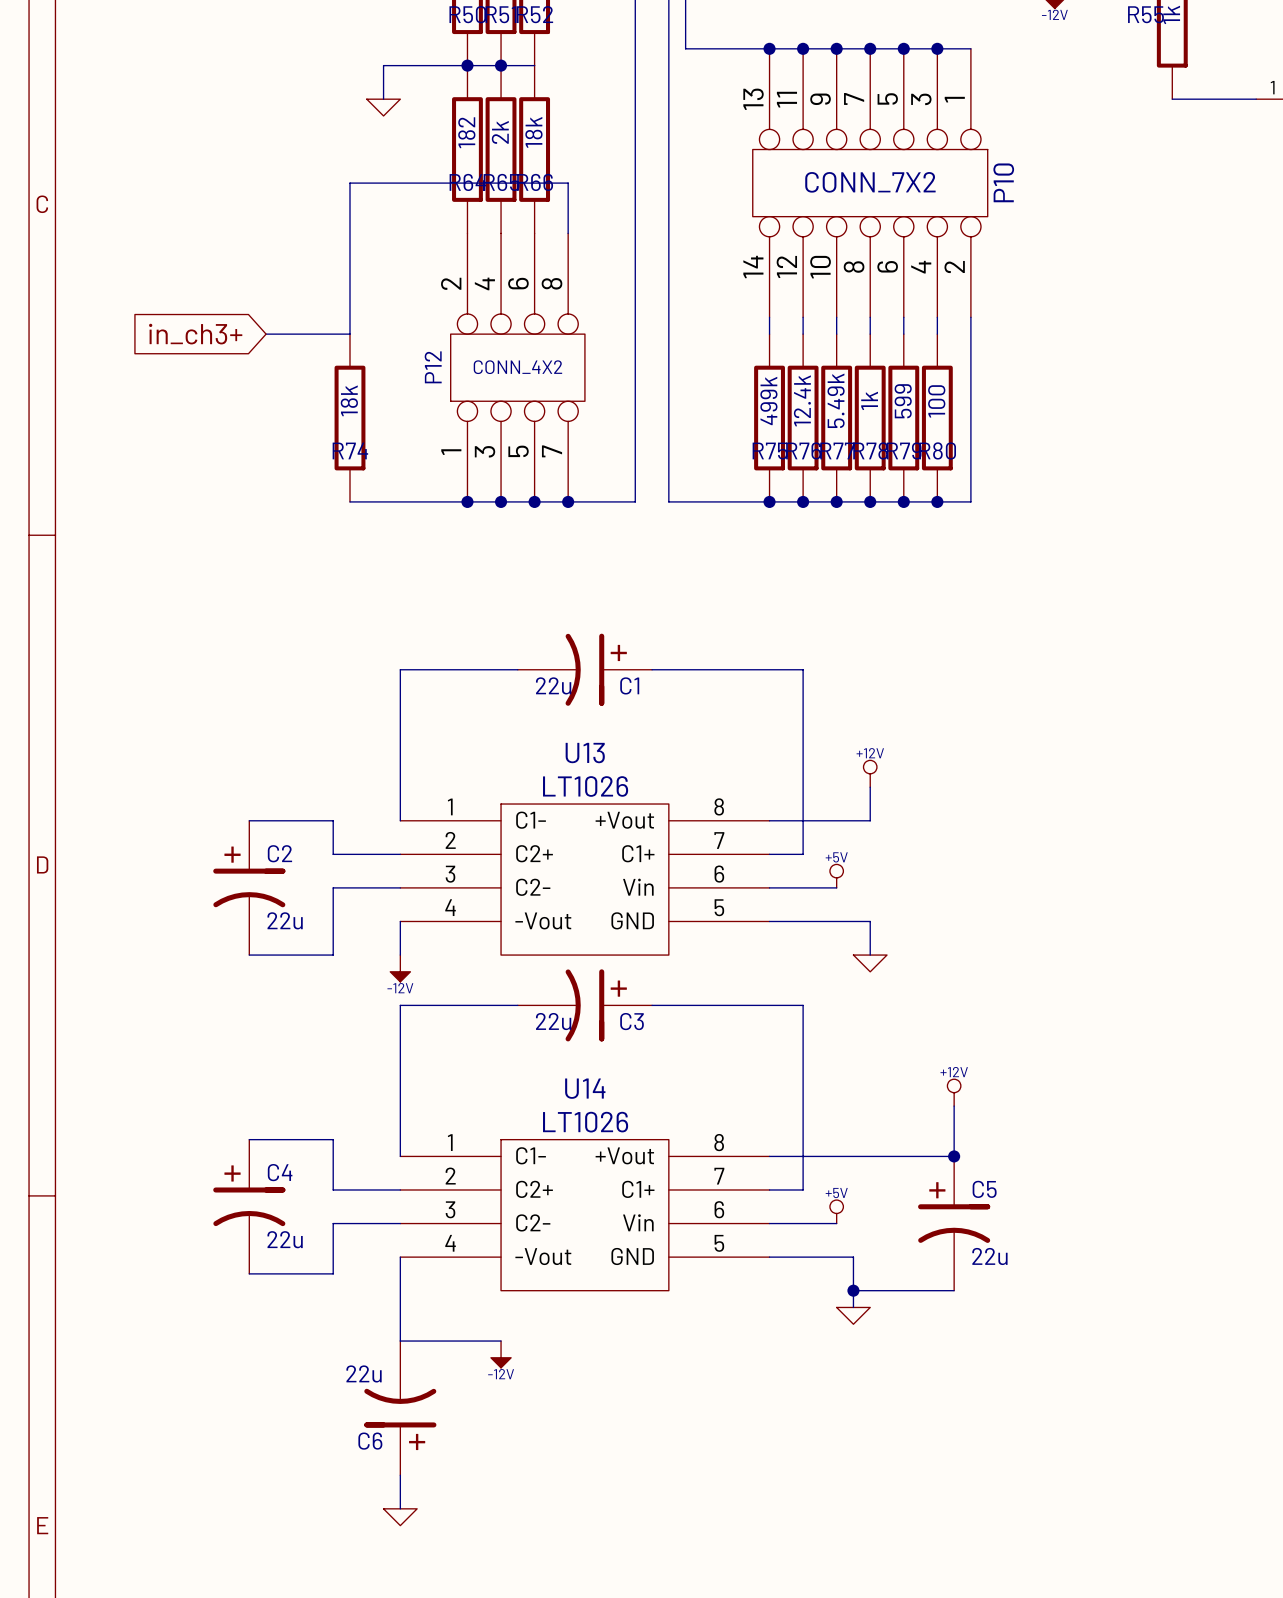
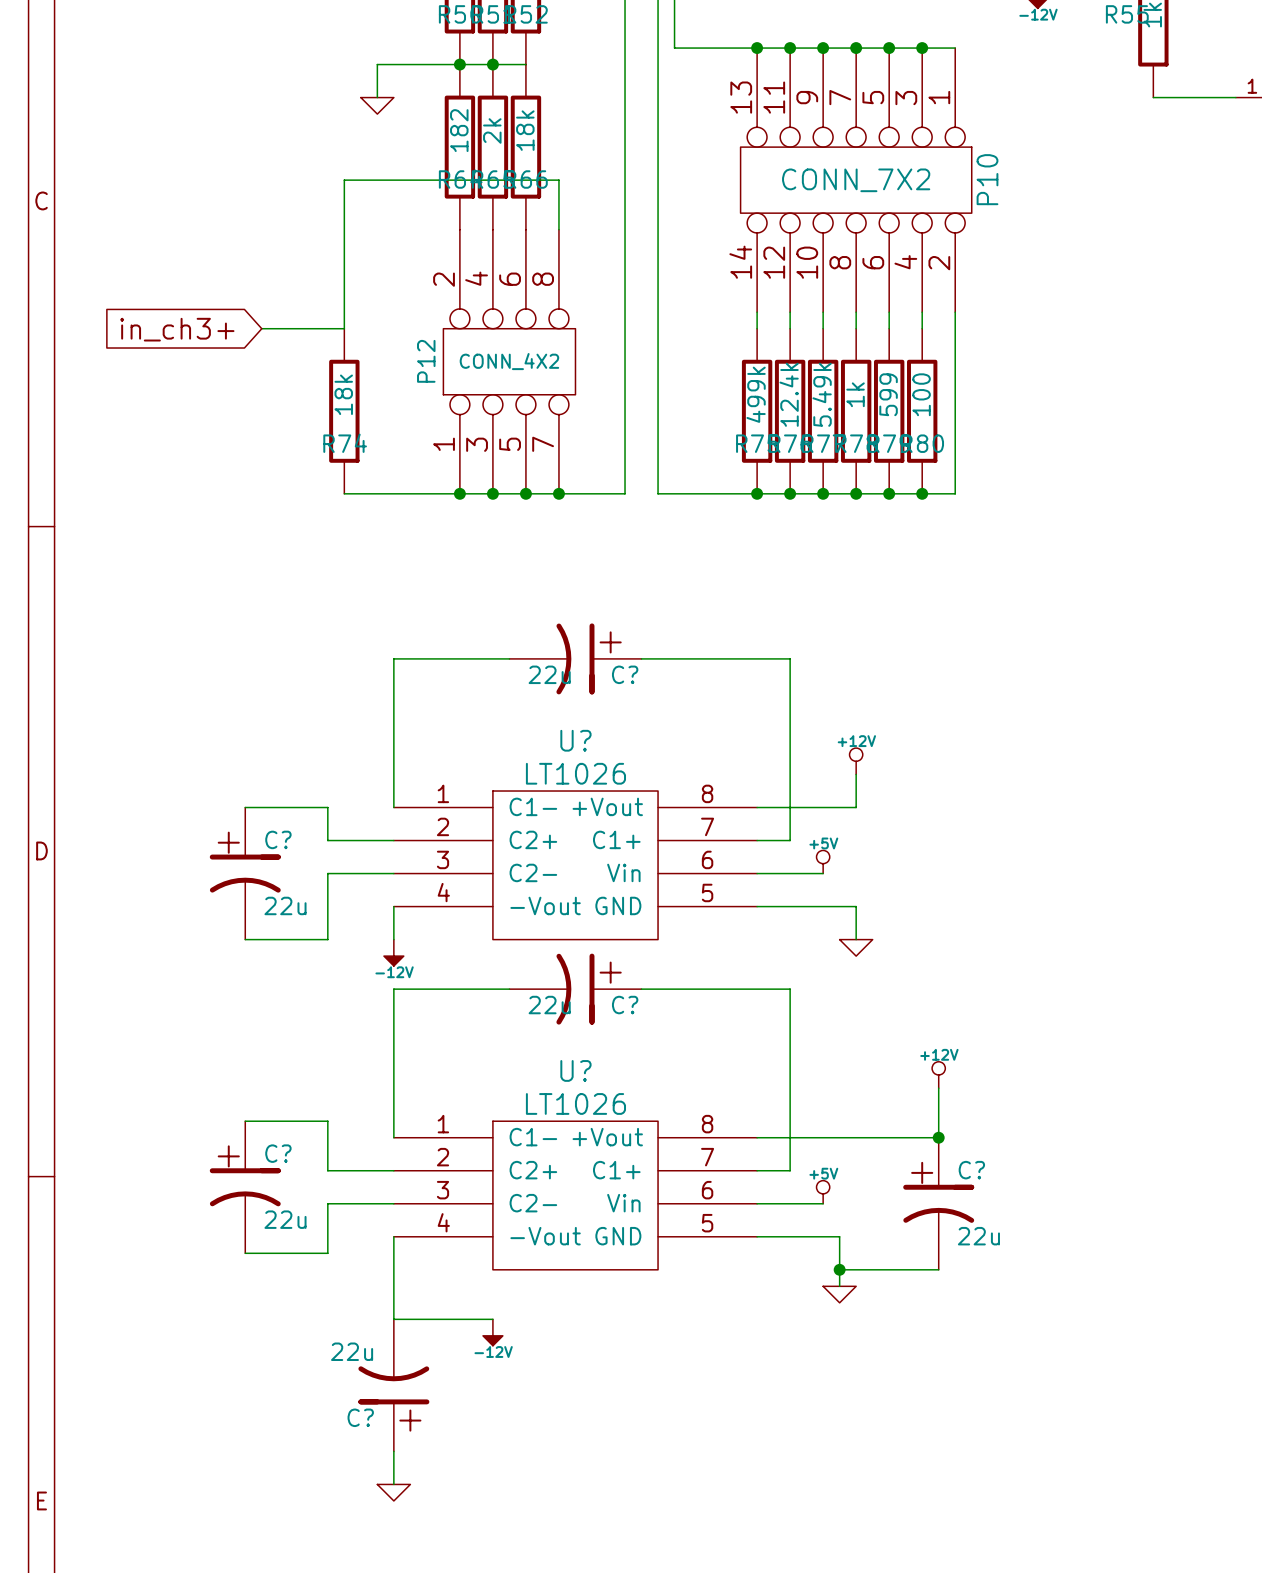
C1 name: C1 (629, 685) -> C? (625, 674)
U13 name: U13 (585, 753) -> U? (575, 740)
C2 name: C2 (279, 853) -> C? (278, 839)
C3 name: C3 (632, 1021) -> C? (625, 1005)
U14 name: U14 (585, 1088) -> U? (575, 1070)
C4 name: C4 (280, 1172) -> C? (278, 1153)
C5 name: C5 (984, 1189) -> C? (971, 1170)
C6 name: C6 (370, 1441) -> C? (360, 1417)

